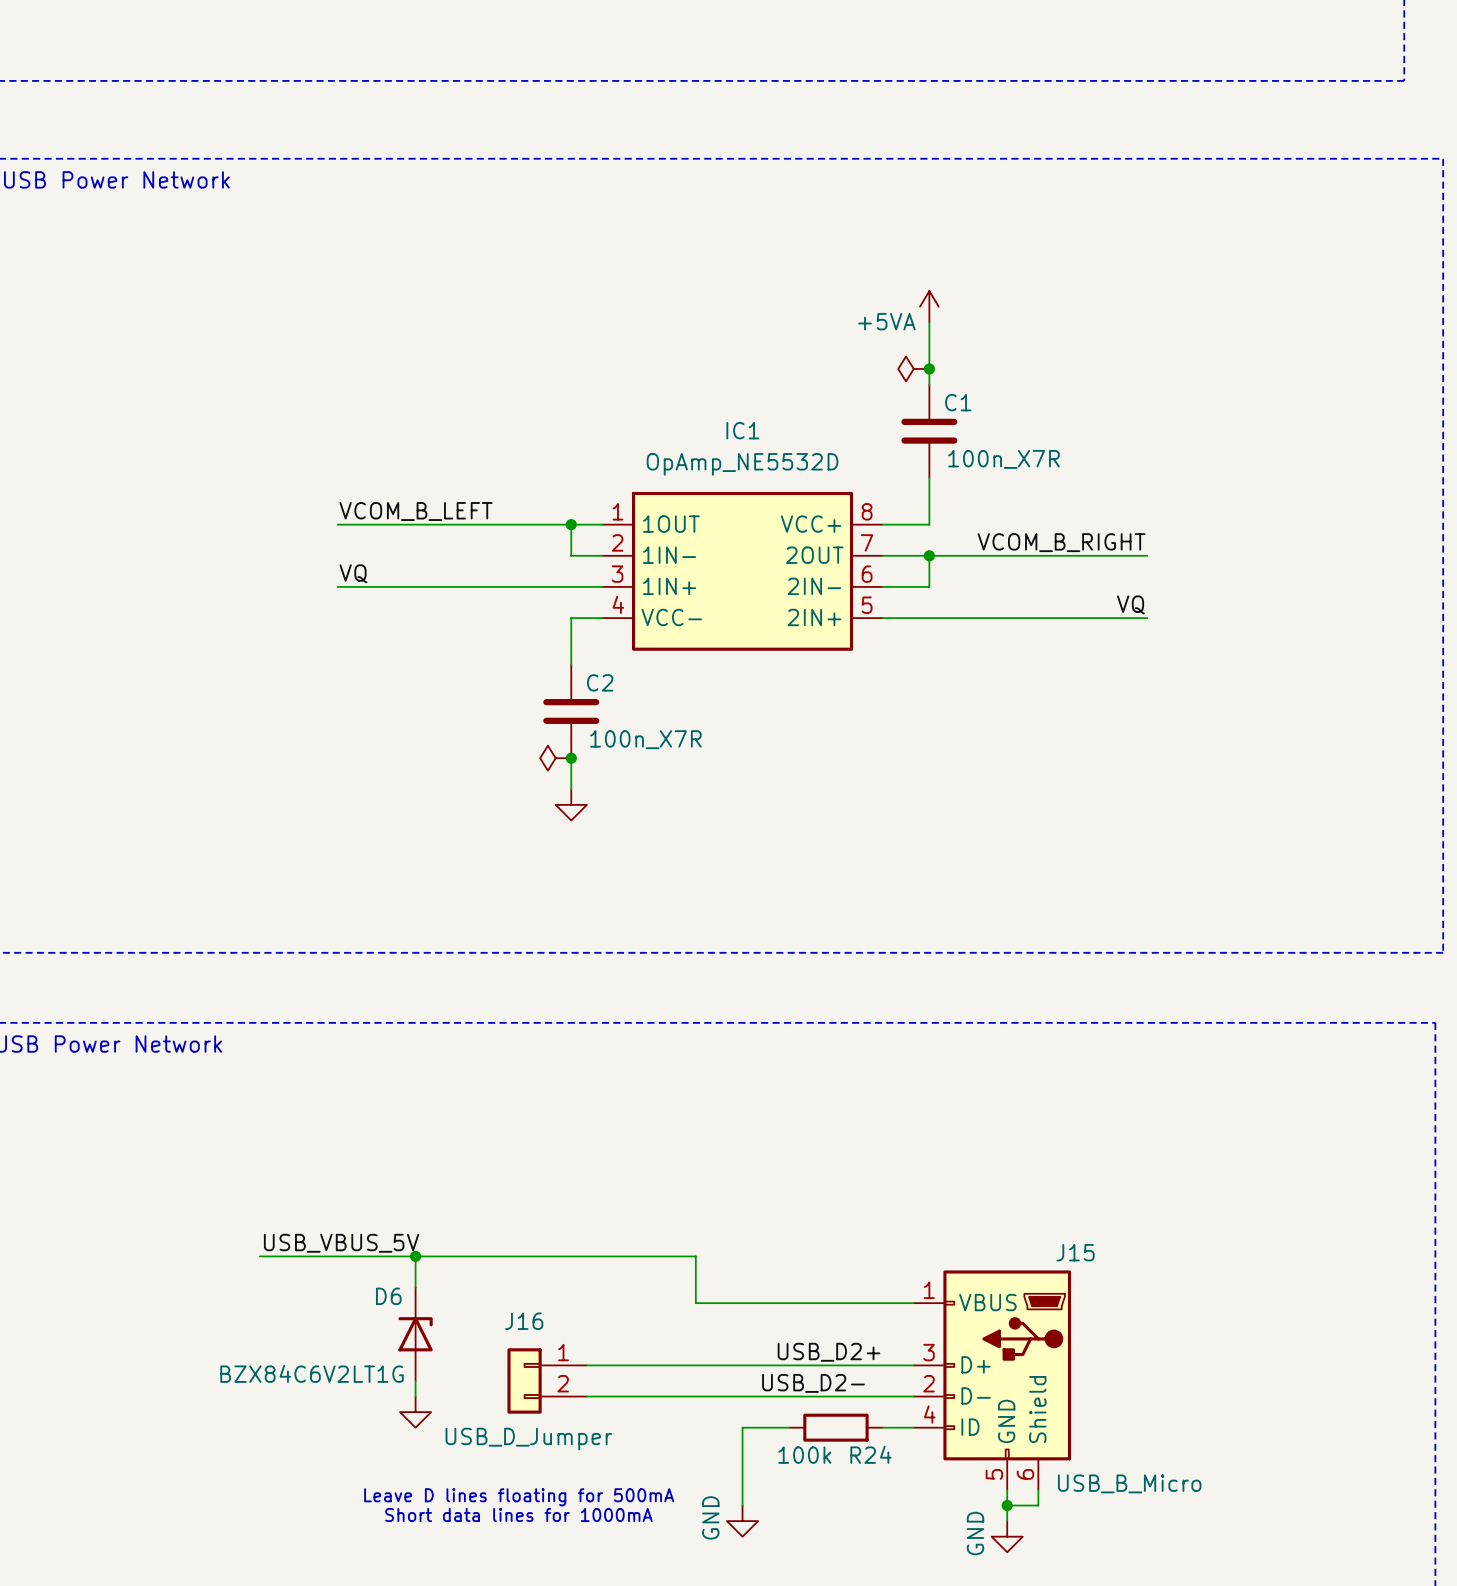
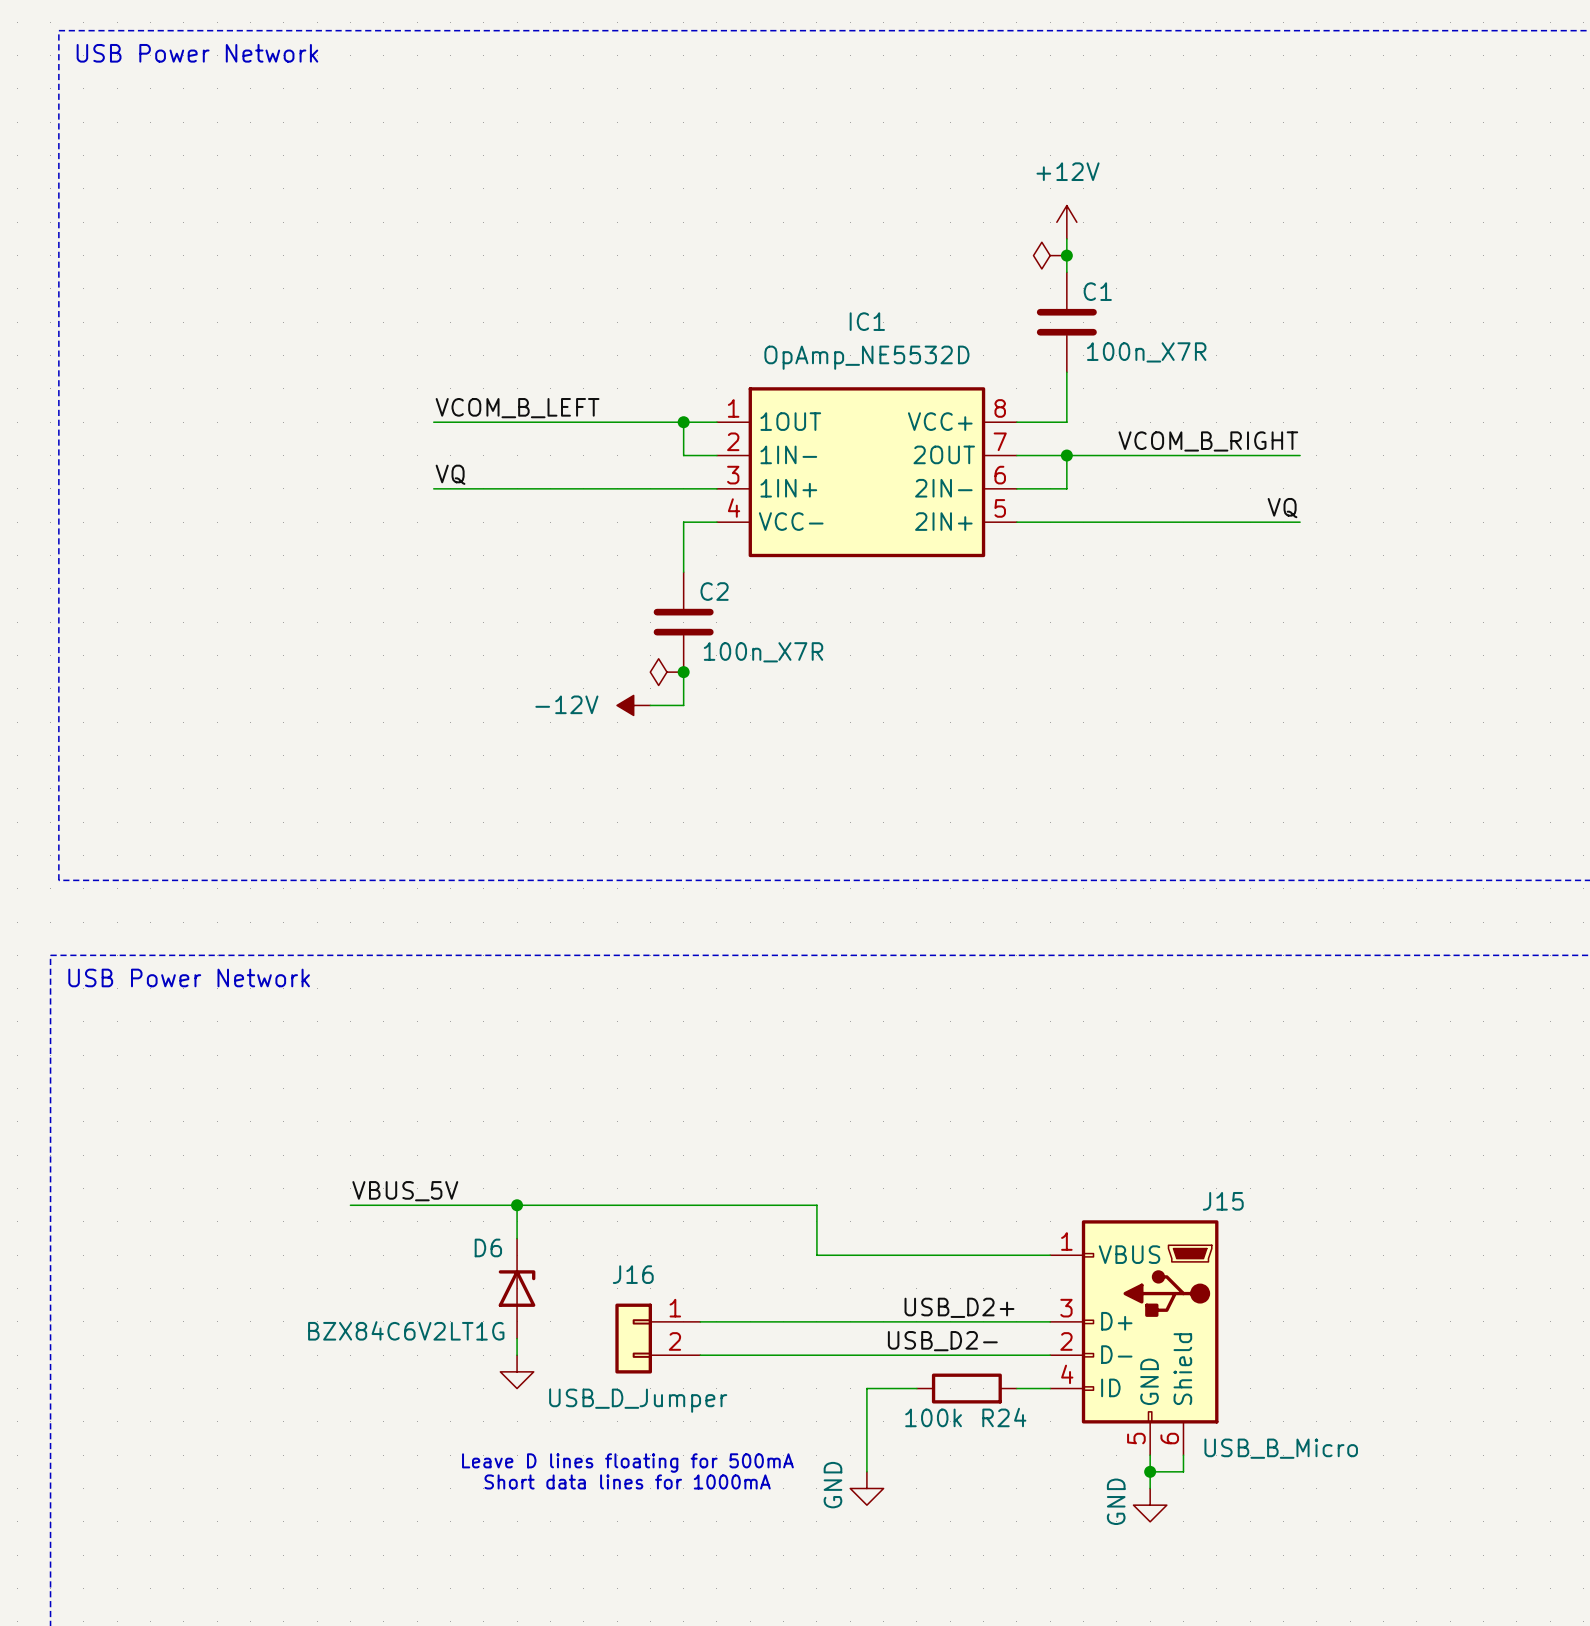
power symbol: +5VA (929, 306) -> none
power symbol: none -> +12V (1066, 222)
power symbol: none -> -12V (633, 705)
wire: none -> (650, 705) (683, 705)
power symbol: (571, 804) -> none
label: USB_VBUS_5V (341, 1243) -> VBUS_5V (405, 1191)

